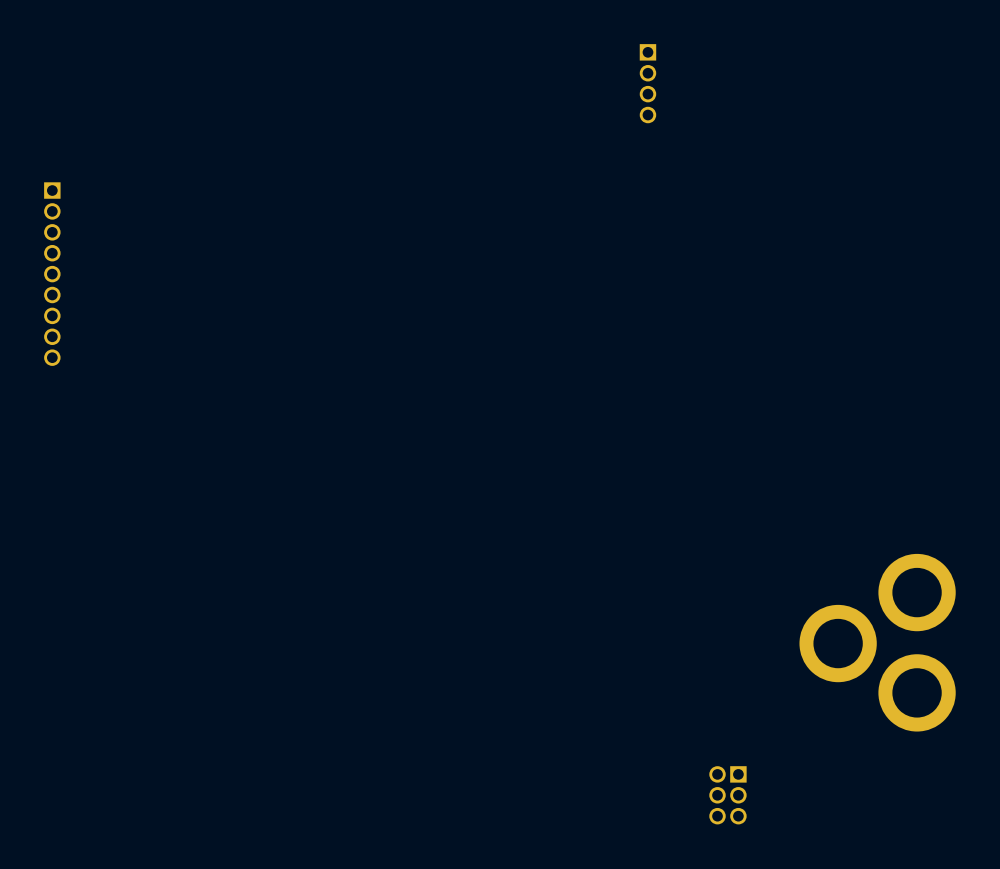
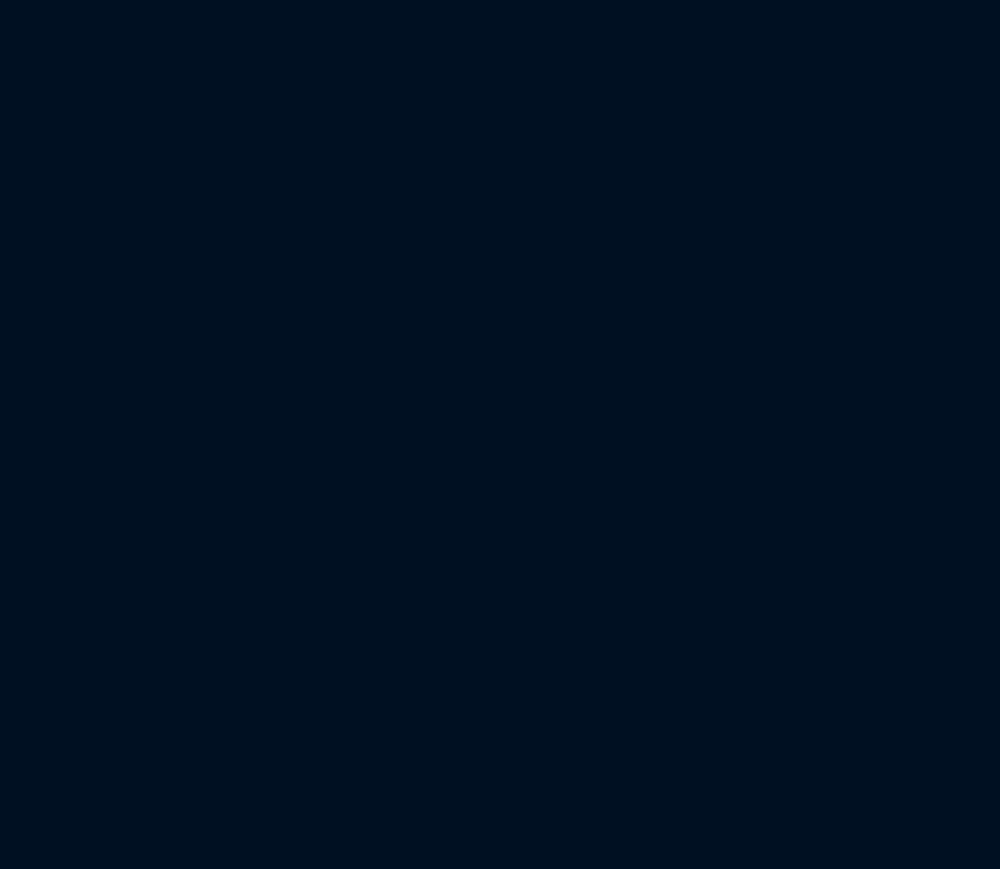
part: (647, 83) -> none
part: (52, 274) -> none
part: (877, 642) -> none
part: (727, 795) -> none

